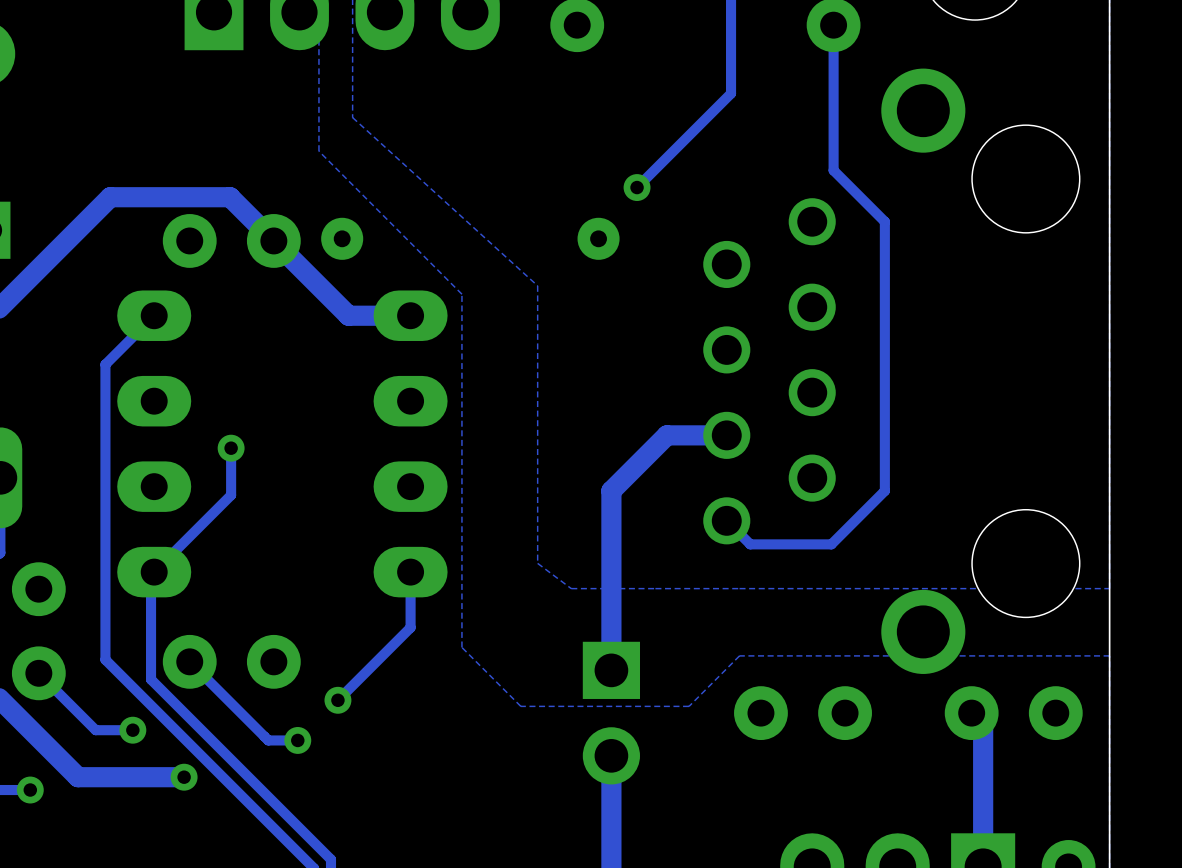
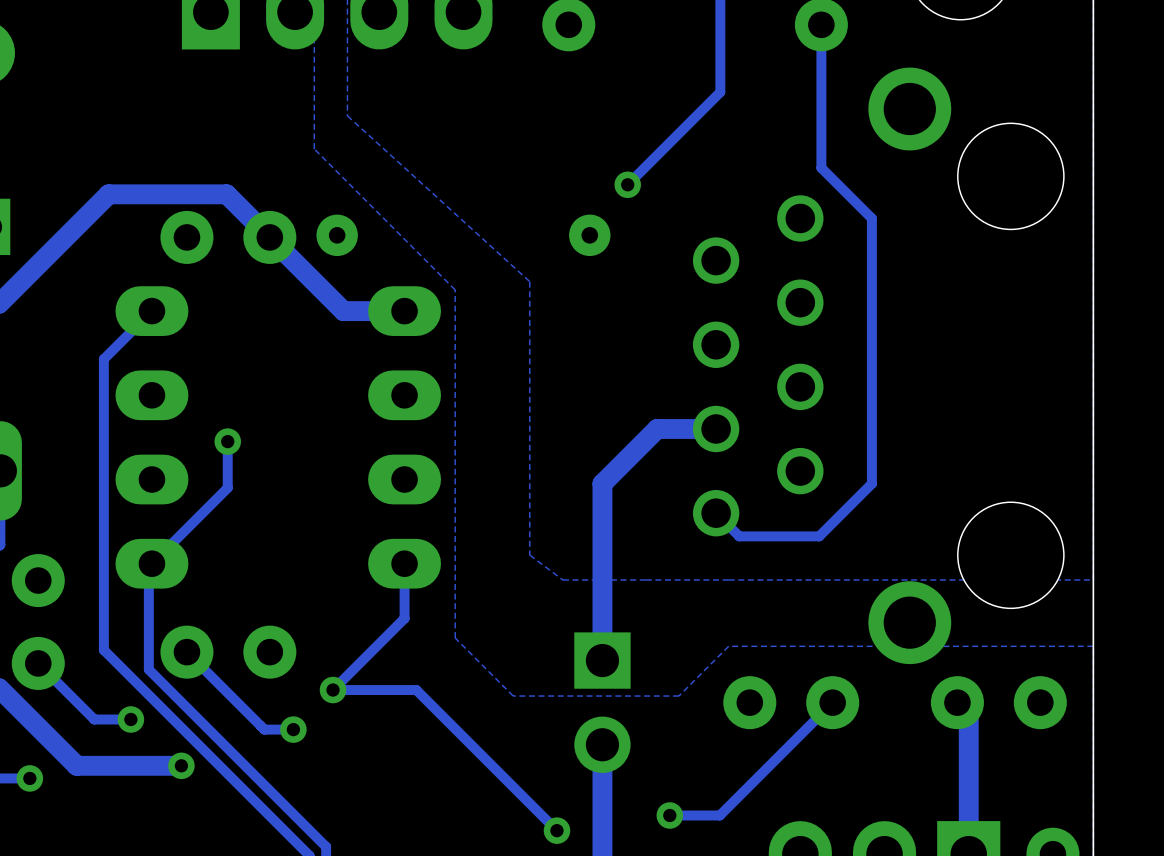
track: none -> (332, 690) (416, 690) (556, 830)
track: none -> (832, 702) (719, 815) (669, 815)
via: none -> (669, 815)
via: none -> (556, 830)

